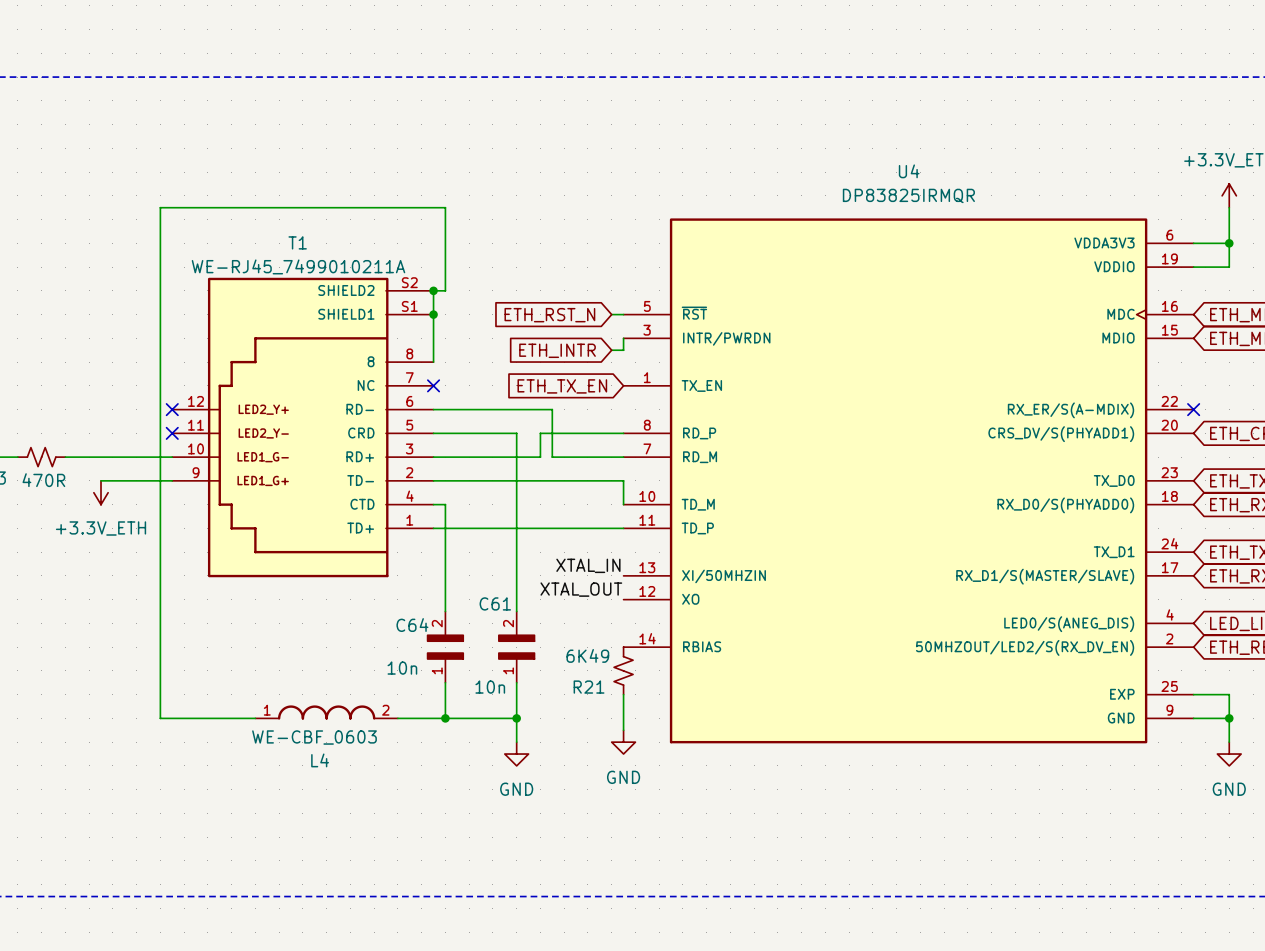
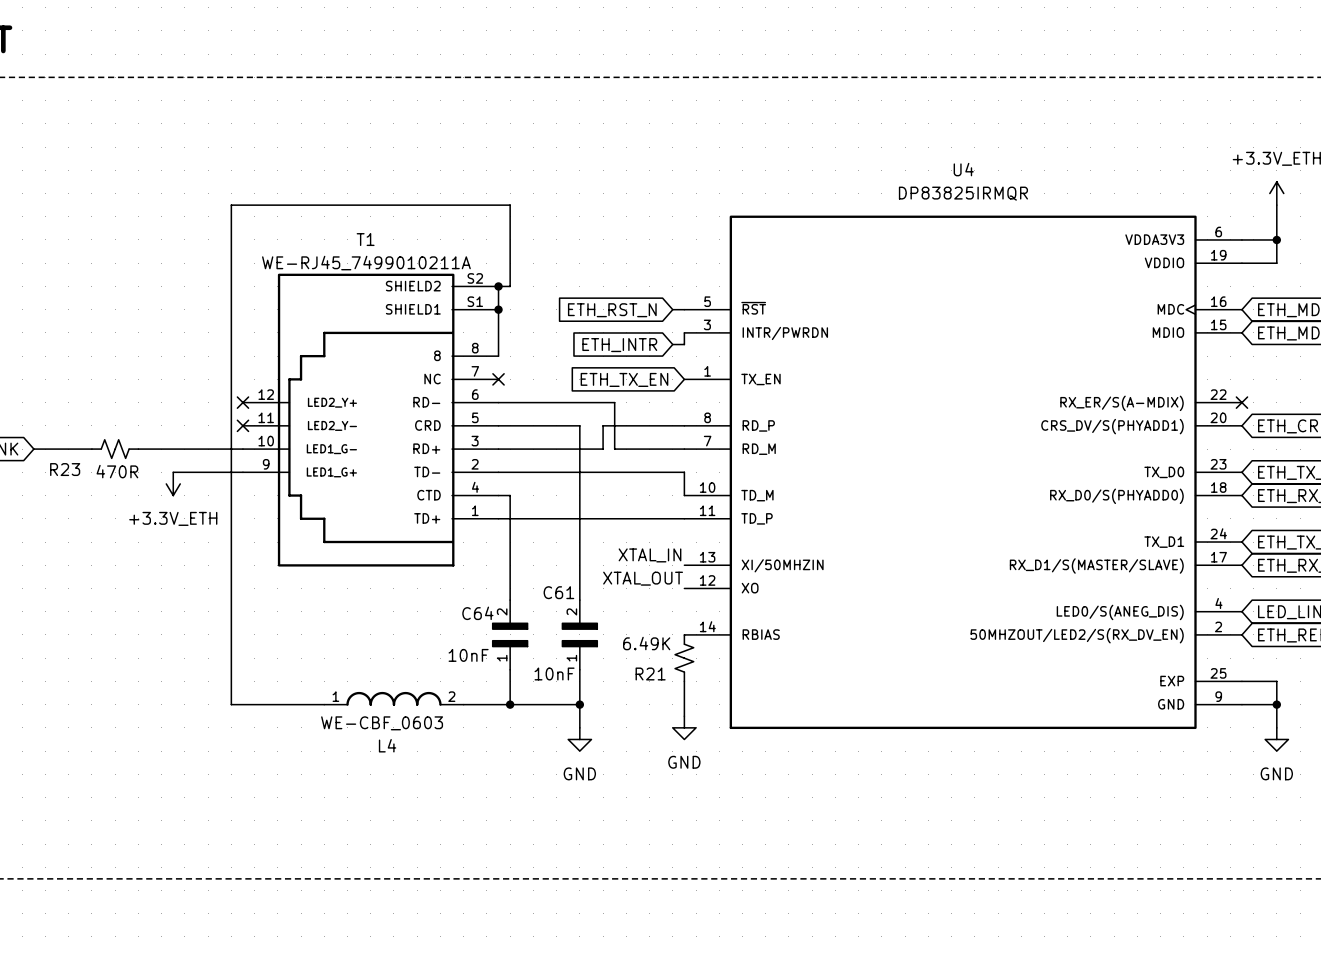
R21 value: 6K49 (587, 655) -> 6.49K (646, 643)
C64 value: 10n (402, 668) -> 10nF (468, 655)
C61 value: 10n (490, 687) -> 10nF (554, 673)

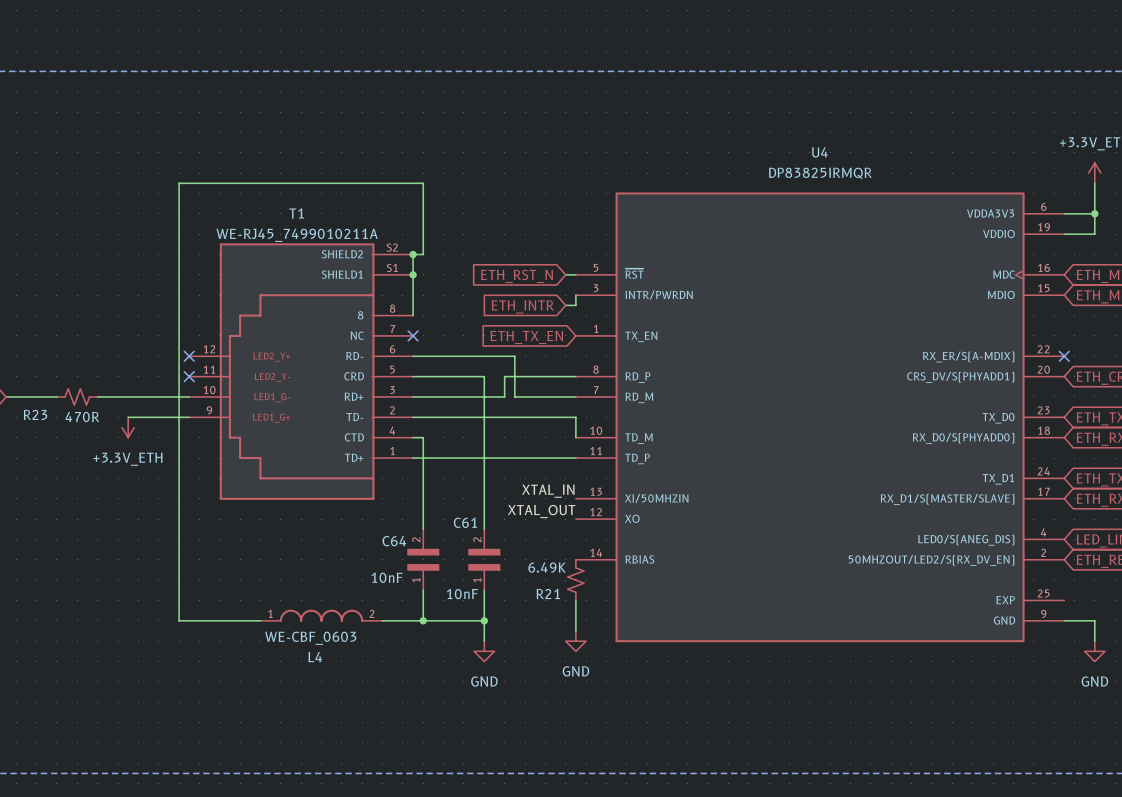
wire: (1241, 681) (1276, 681) (1276, 704) -> none
junction: (1276, 704) -> none

